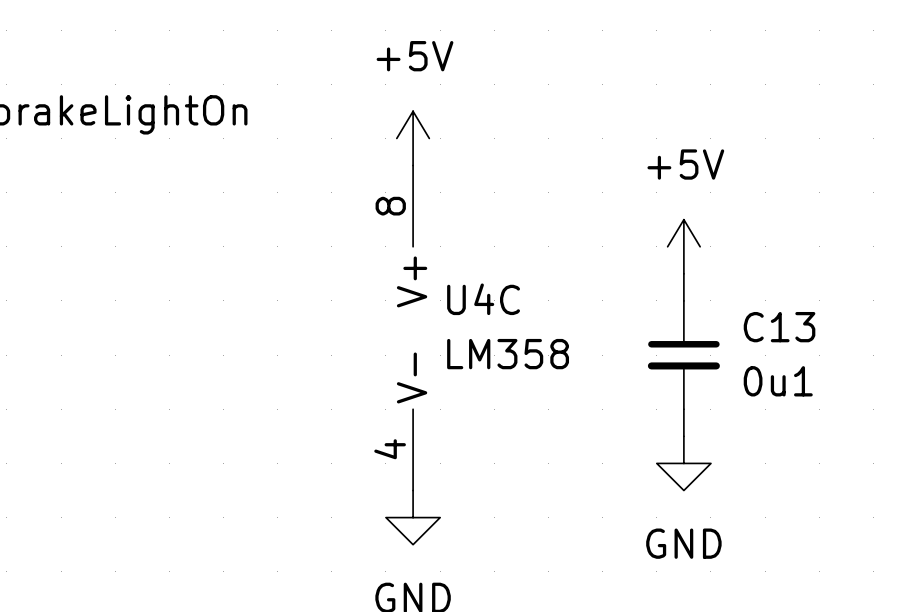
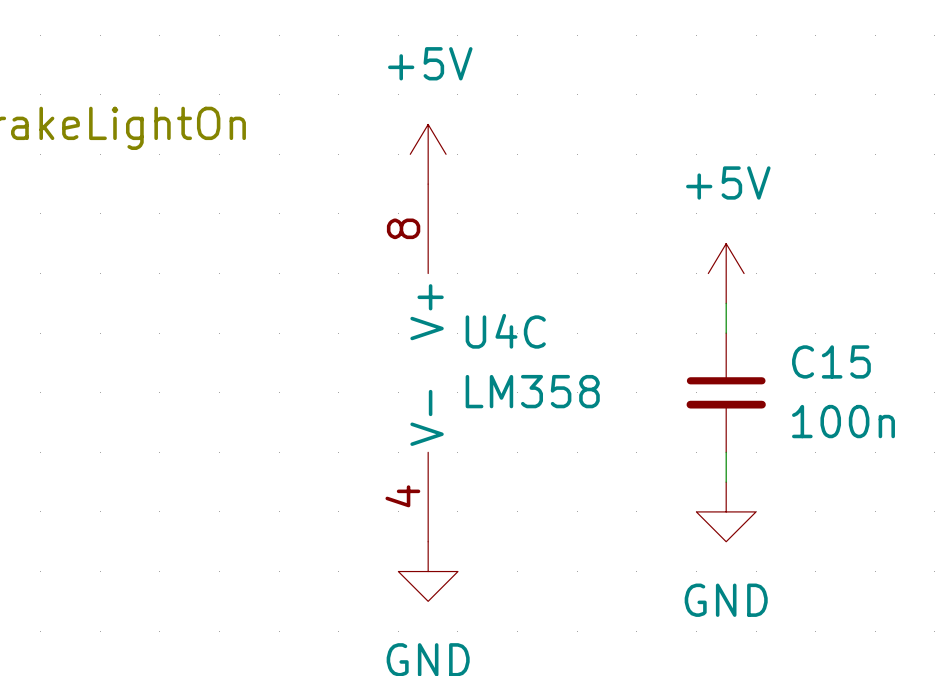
C13 name: C13 (779, 327) -> C15 (831, 361)
C13 value: 0u1 (778, 381) -> 100n (843, 421)

